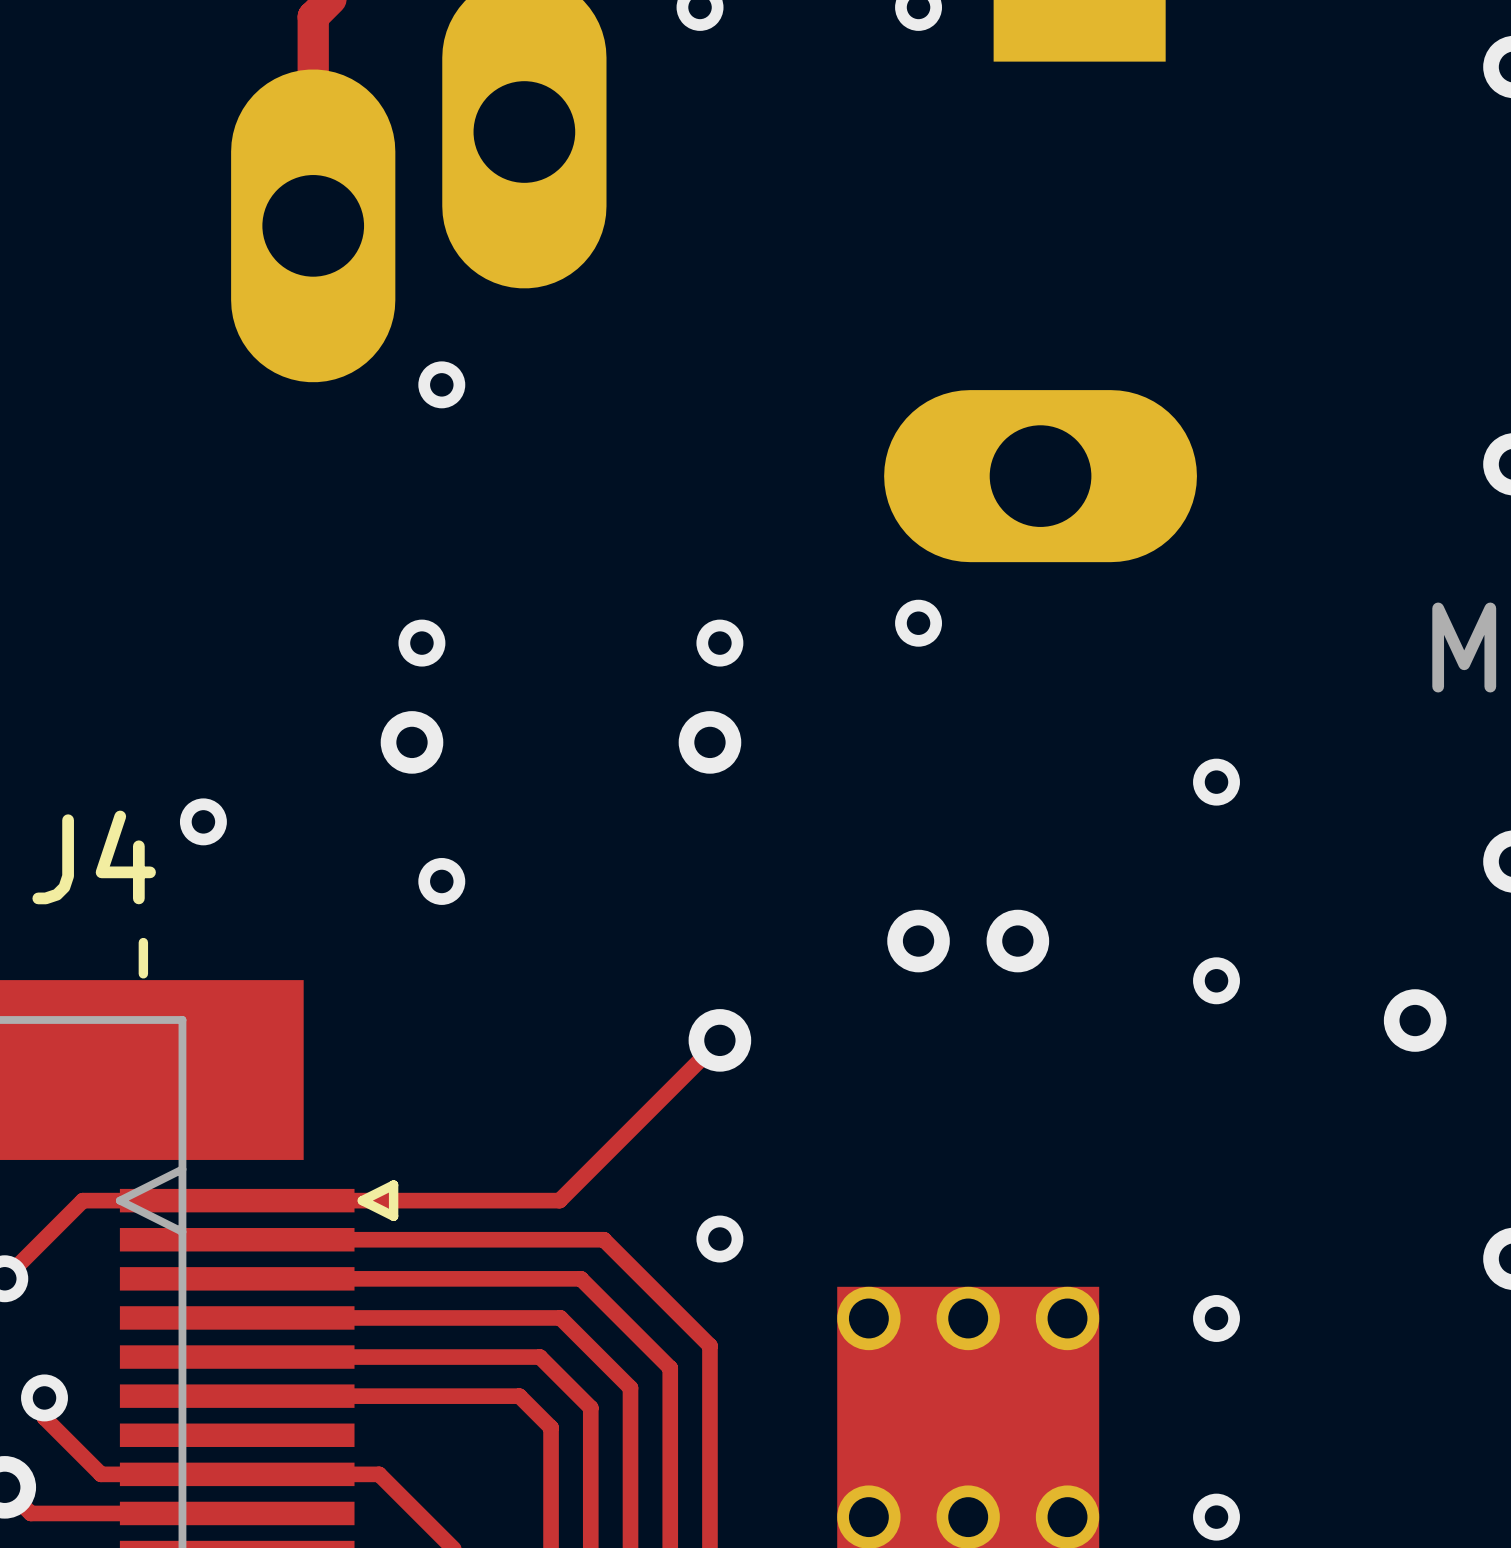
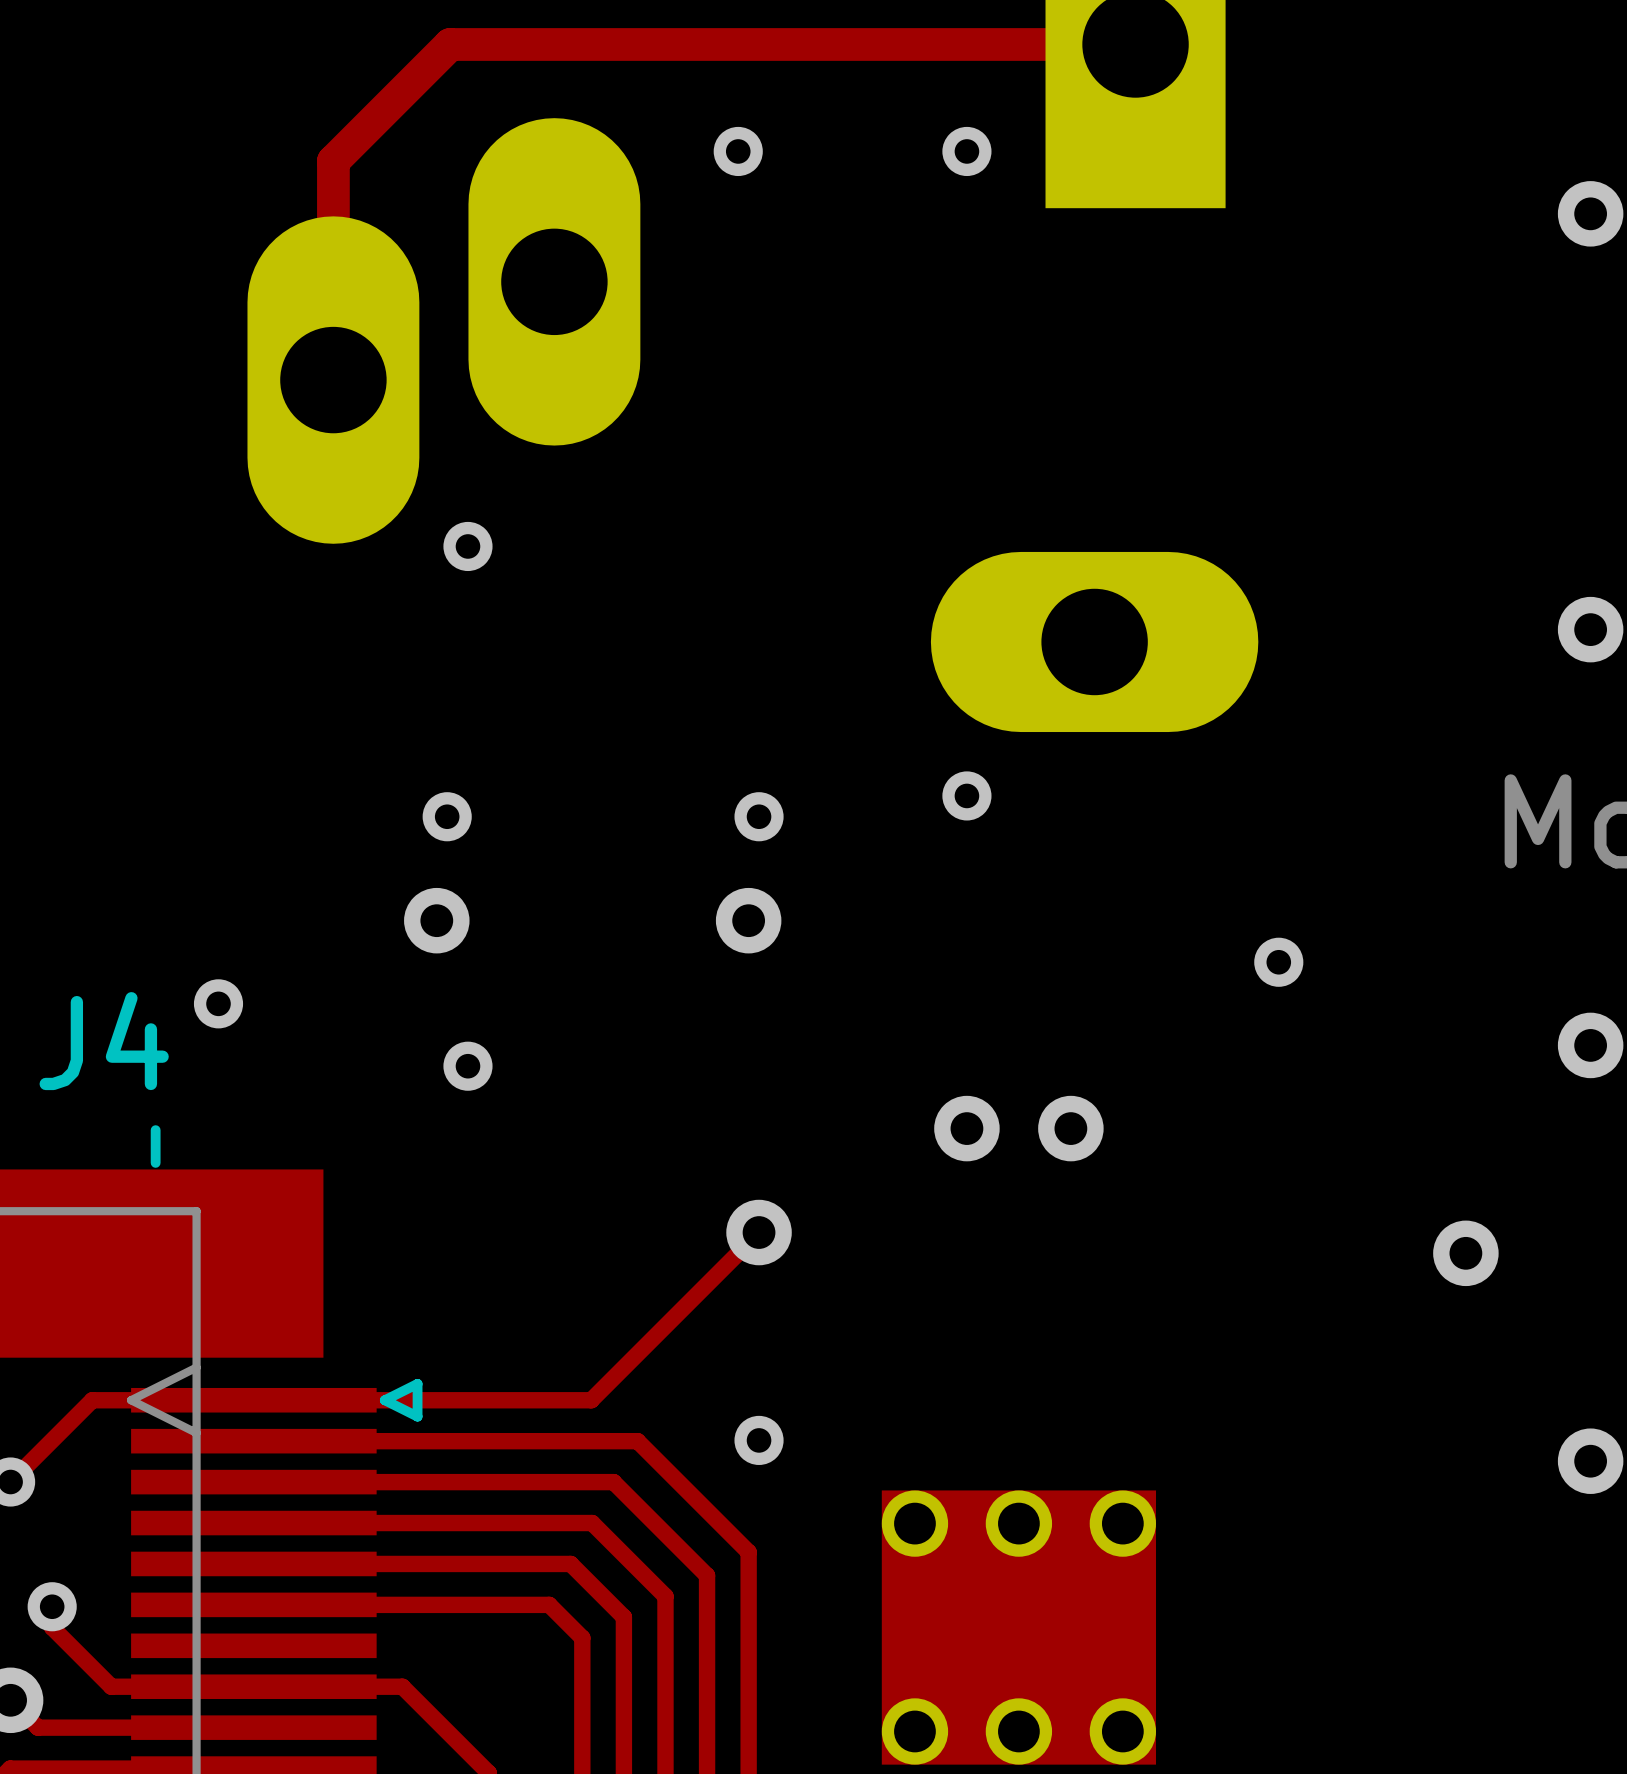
via: (1216, 980) -> none
via position: (1415, 1020) -> (1465, 1253)
via: (1216, 1318) -> none
via: (1216, 1517) -> none

